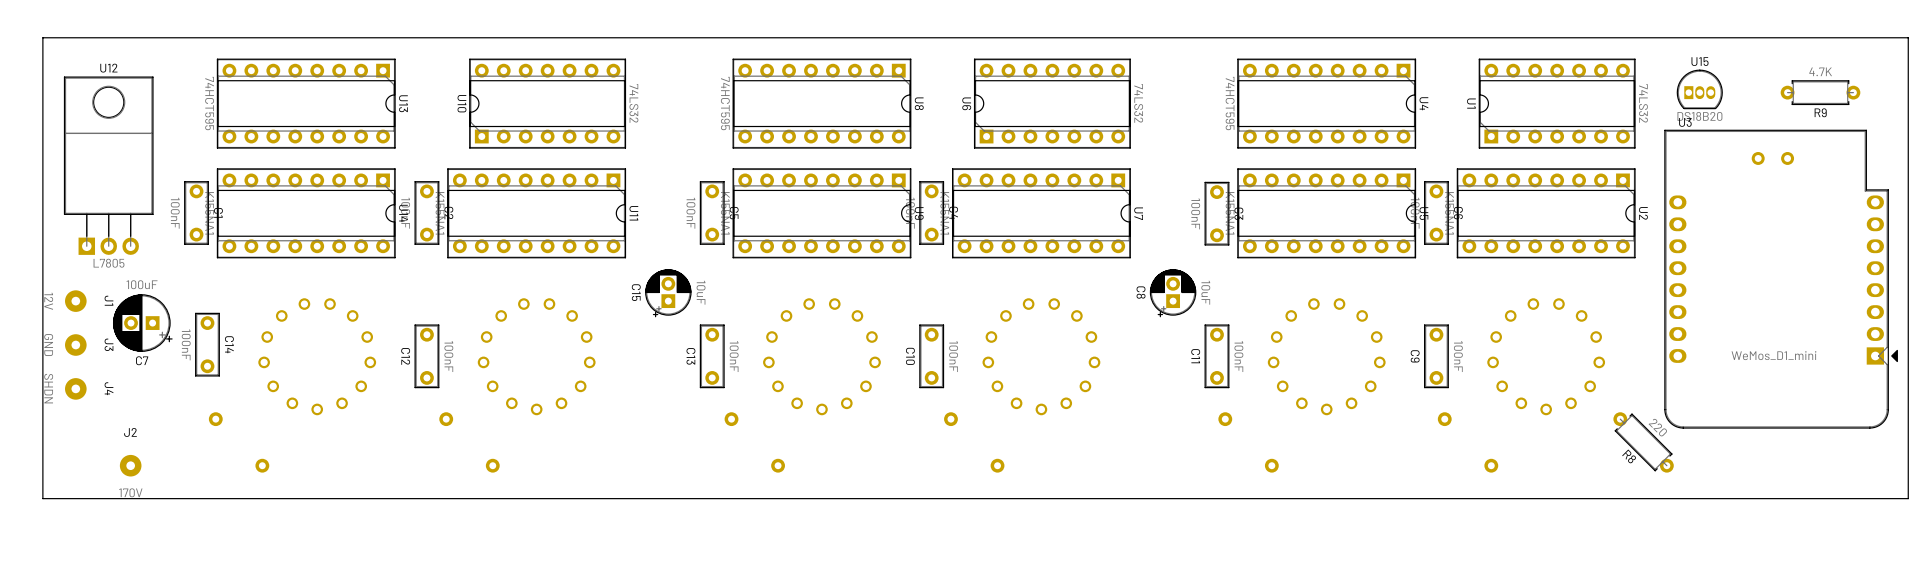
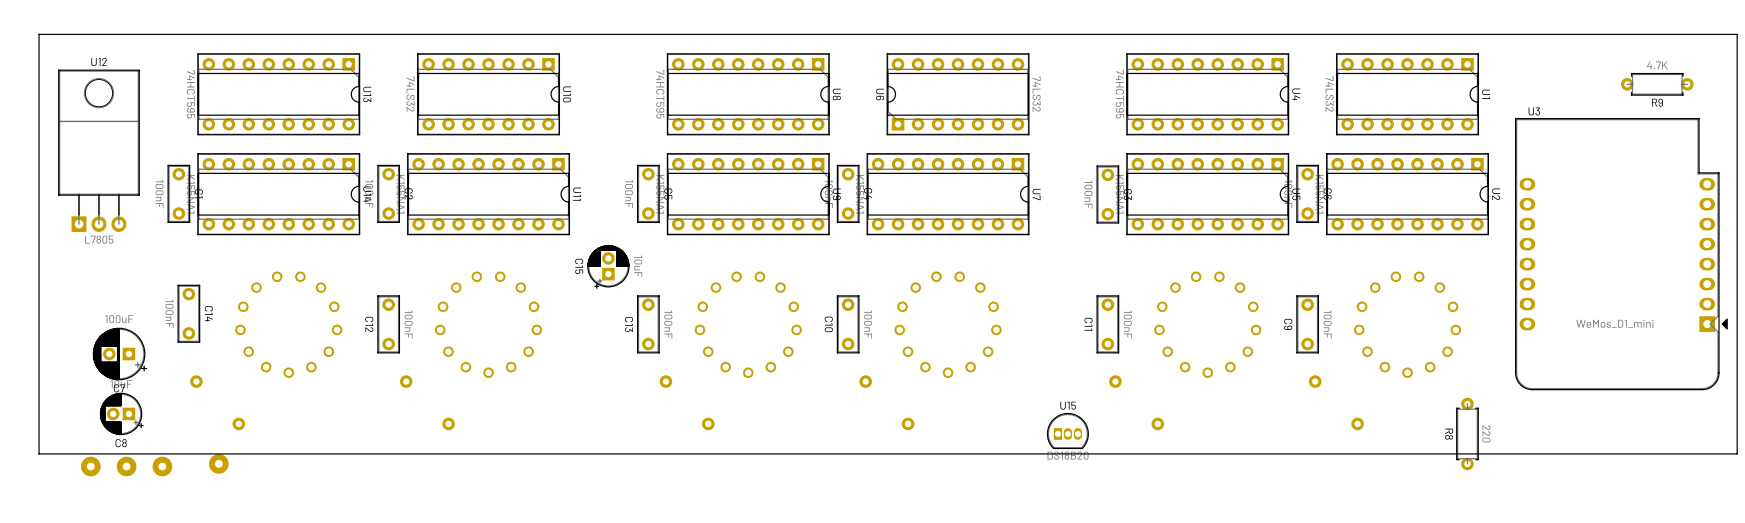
U15 position: (1699, 89) -> (1067, 430)
U10 rotation: 0° (547, 103) -> 180° (488, 94)
U1 rotation: 0° (1557, 103) -> 180° (1407, 94)
part: (1772, 158) -> none
C8 rotation: 0° (1173, 293) -> 90° counterclockwise (121, 413)
C8 position: (1173, 293) -> (121, 413)
J1 position: (75, 301) -> (90, 466)
C7 position: (142, 323) -> (120, 354)
J3 position: (75, 345) -> (162, 466)
J4 position: (75, 388) -> (218, 463)
R8 footprint: [1613, 412, 1674, 473] -> [1456, 397, 1479, 471]
J2 position: (130, 465) -> (126, 466)

